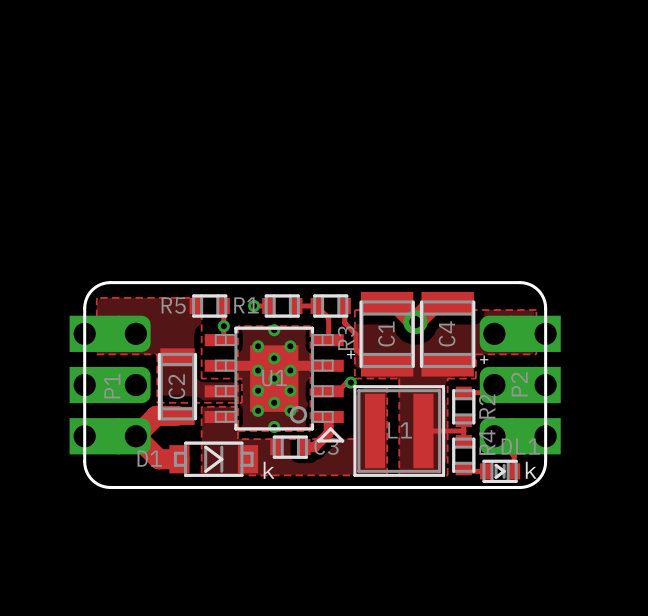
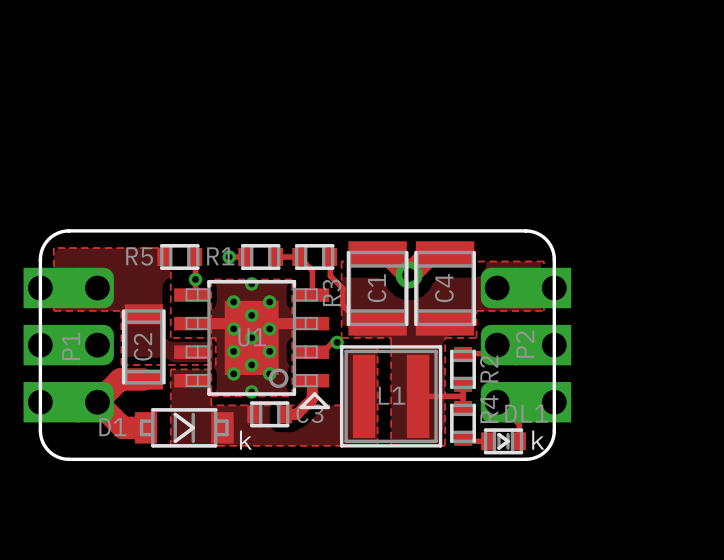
text: + (351, 354) -> none
text: + (484, 359) -> none

